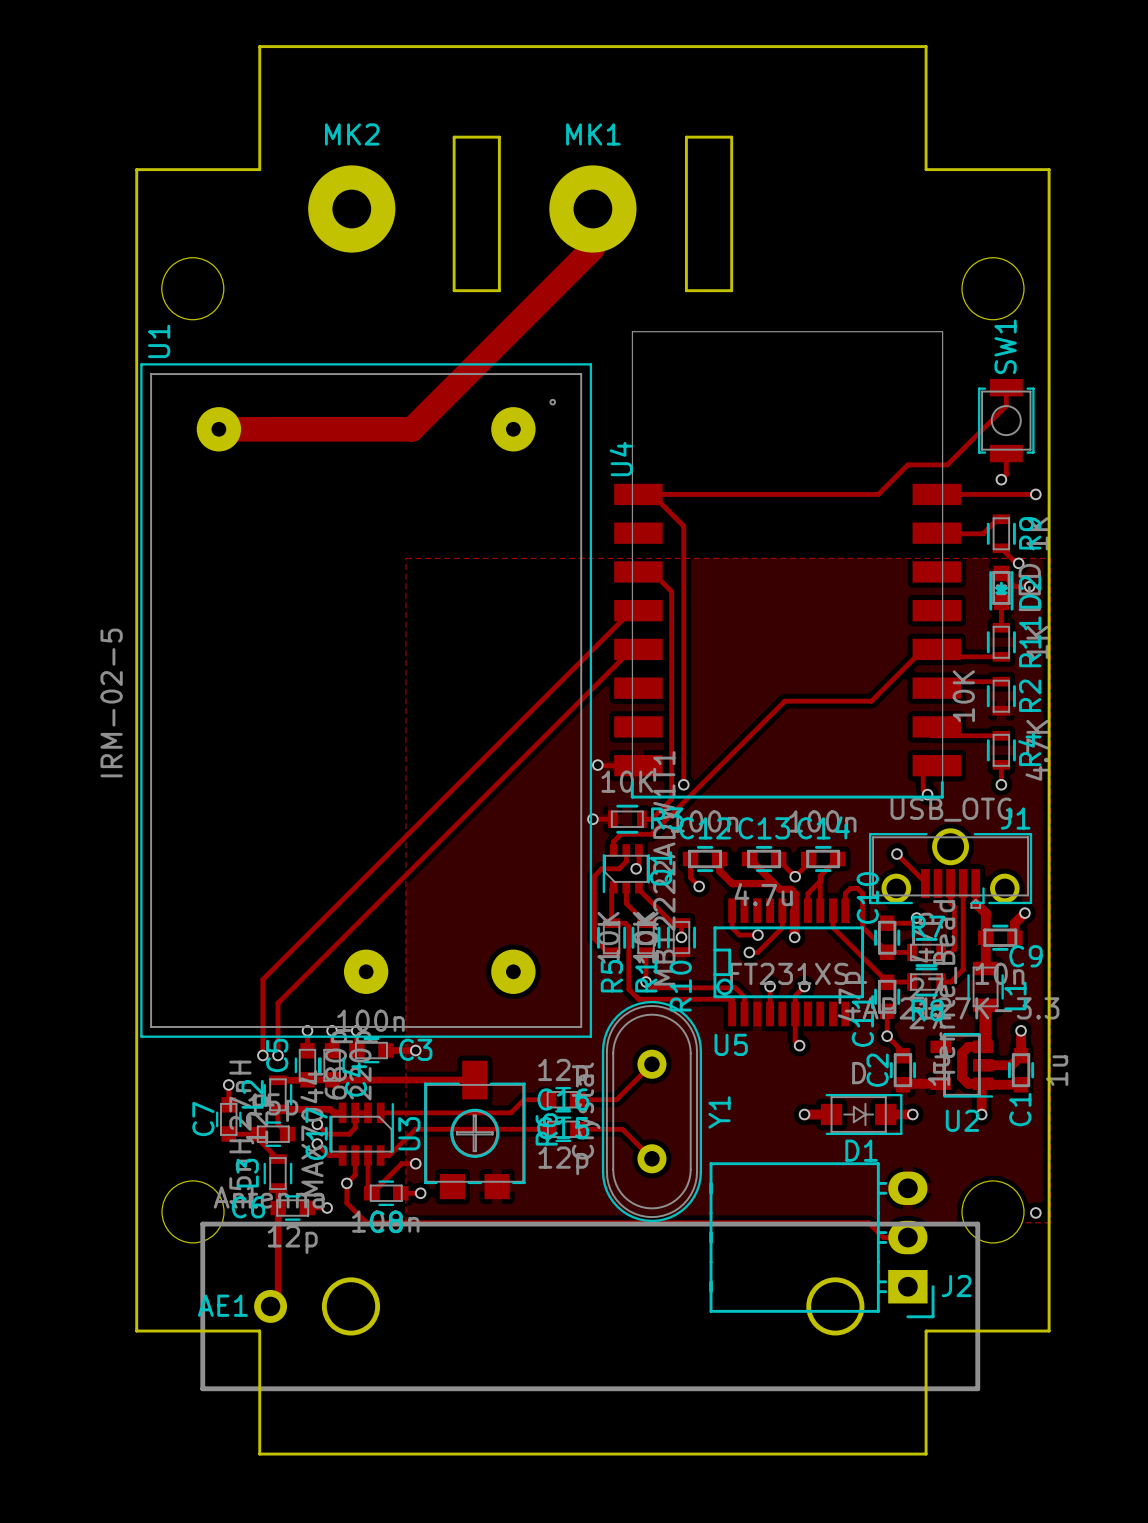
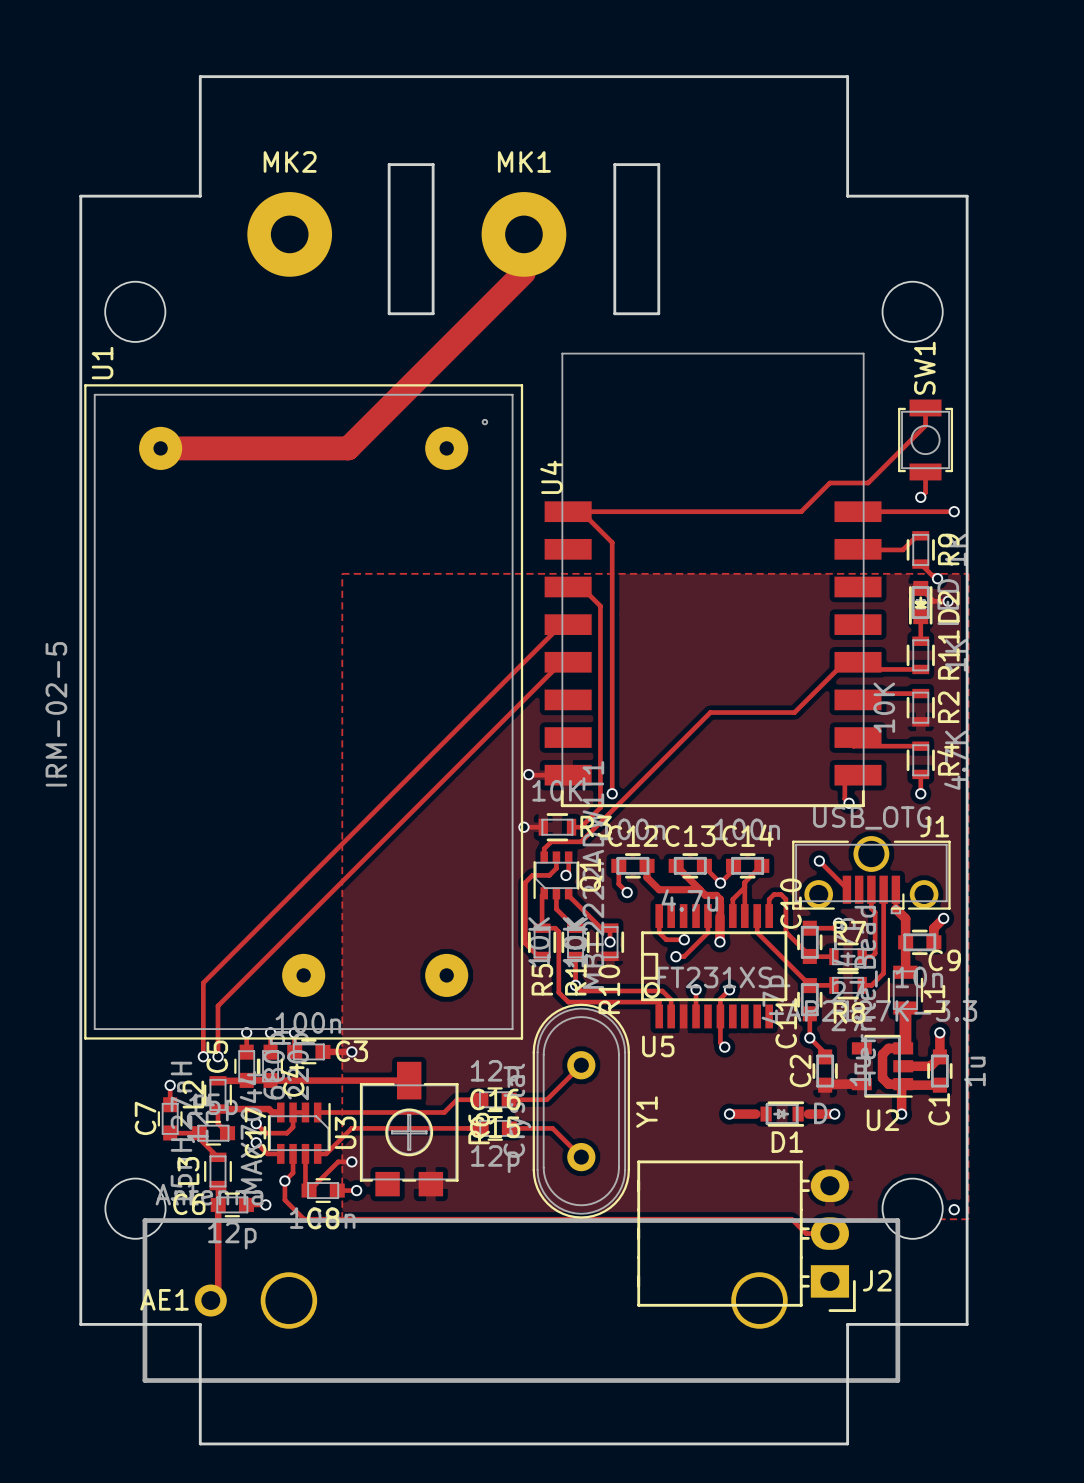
D1 value position: D (859, 1073) -> D (820, 1113)
D1 footprint: [820, 1093, 903, 1136] -> [760, 1101, 805, 1127]

